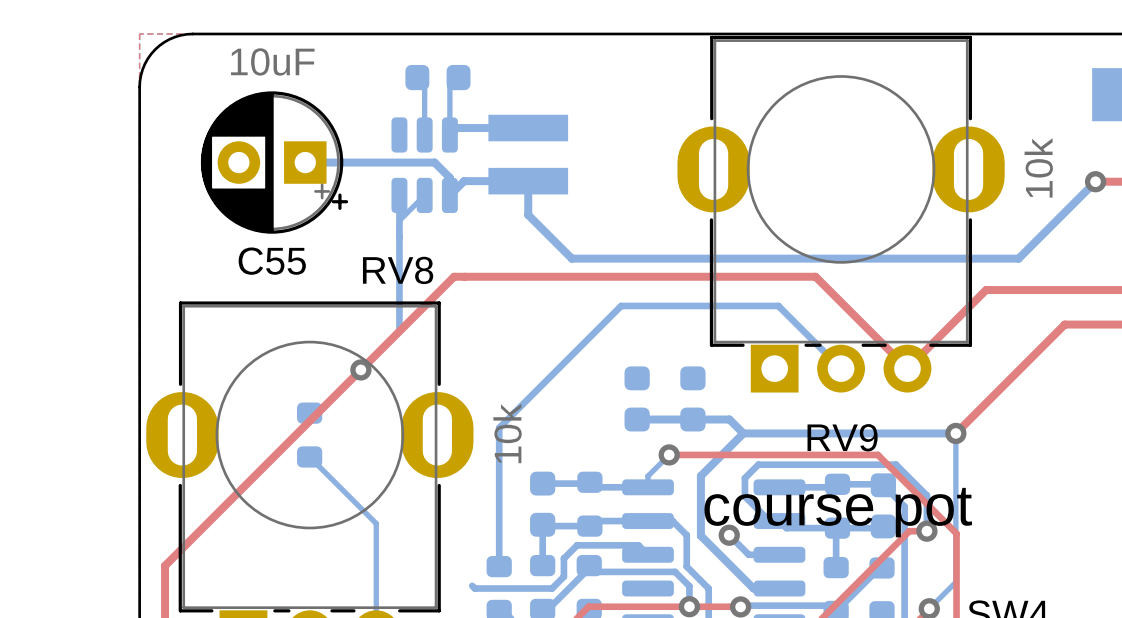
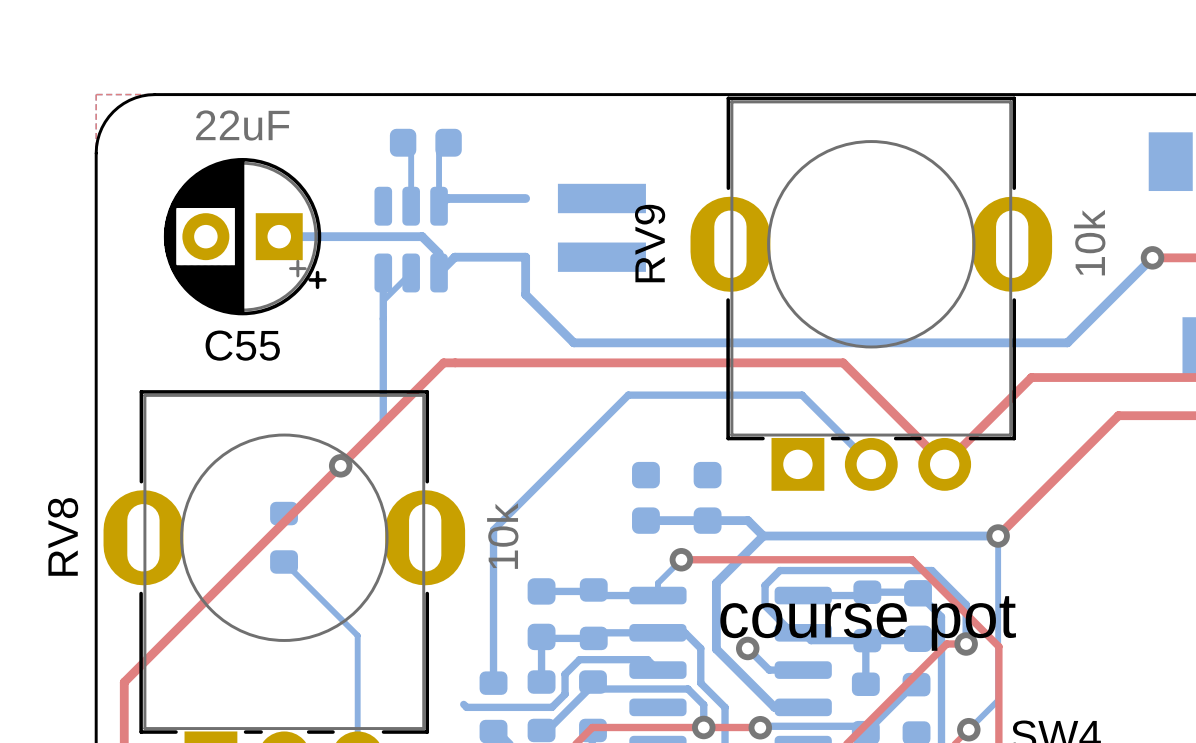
C55 value: 10uF (272, 61) -> 22uF (242, 125)
part position: (528, 154) -> (601, 227)
RV8 name rotation: 0° (398, 270) -> 90° counterclockwise (63, 536)
RV8 name position: RV8 (398, 270) -> RV8 (63, 536)
RV9 name rotation: 0° (842, 437) -> 90° counterclockwise (650, 243)
RV9 name position: RV9 (842, 437) -> RV9 (650, 243)

